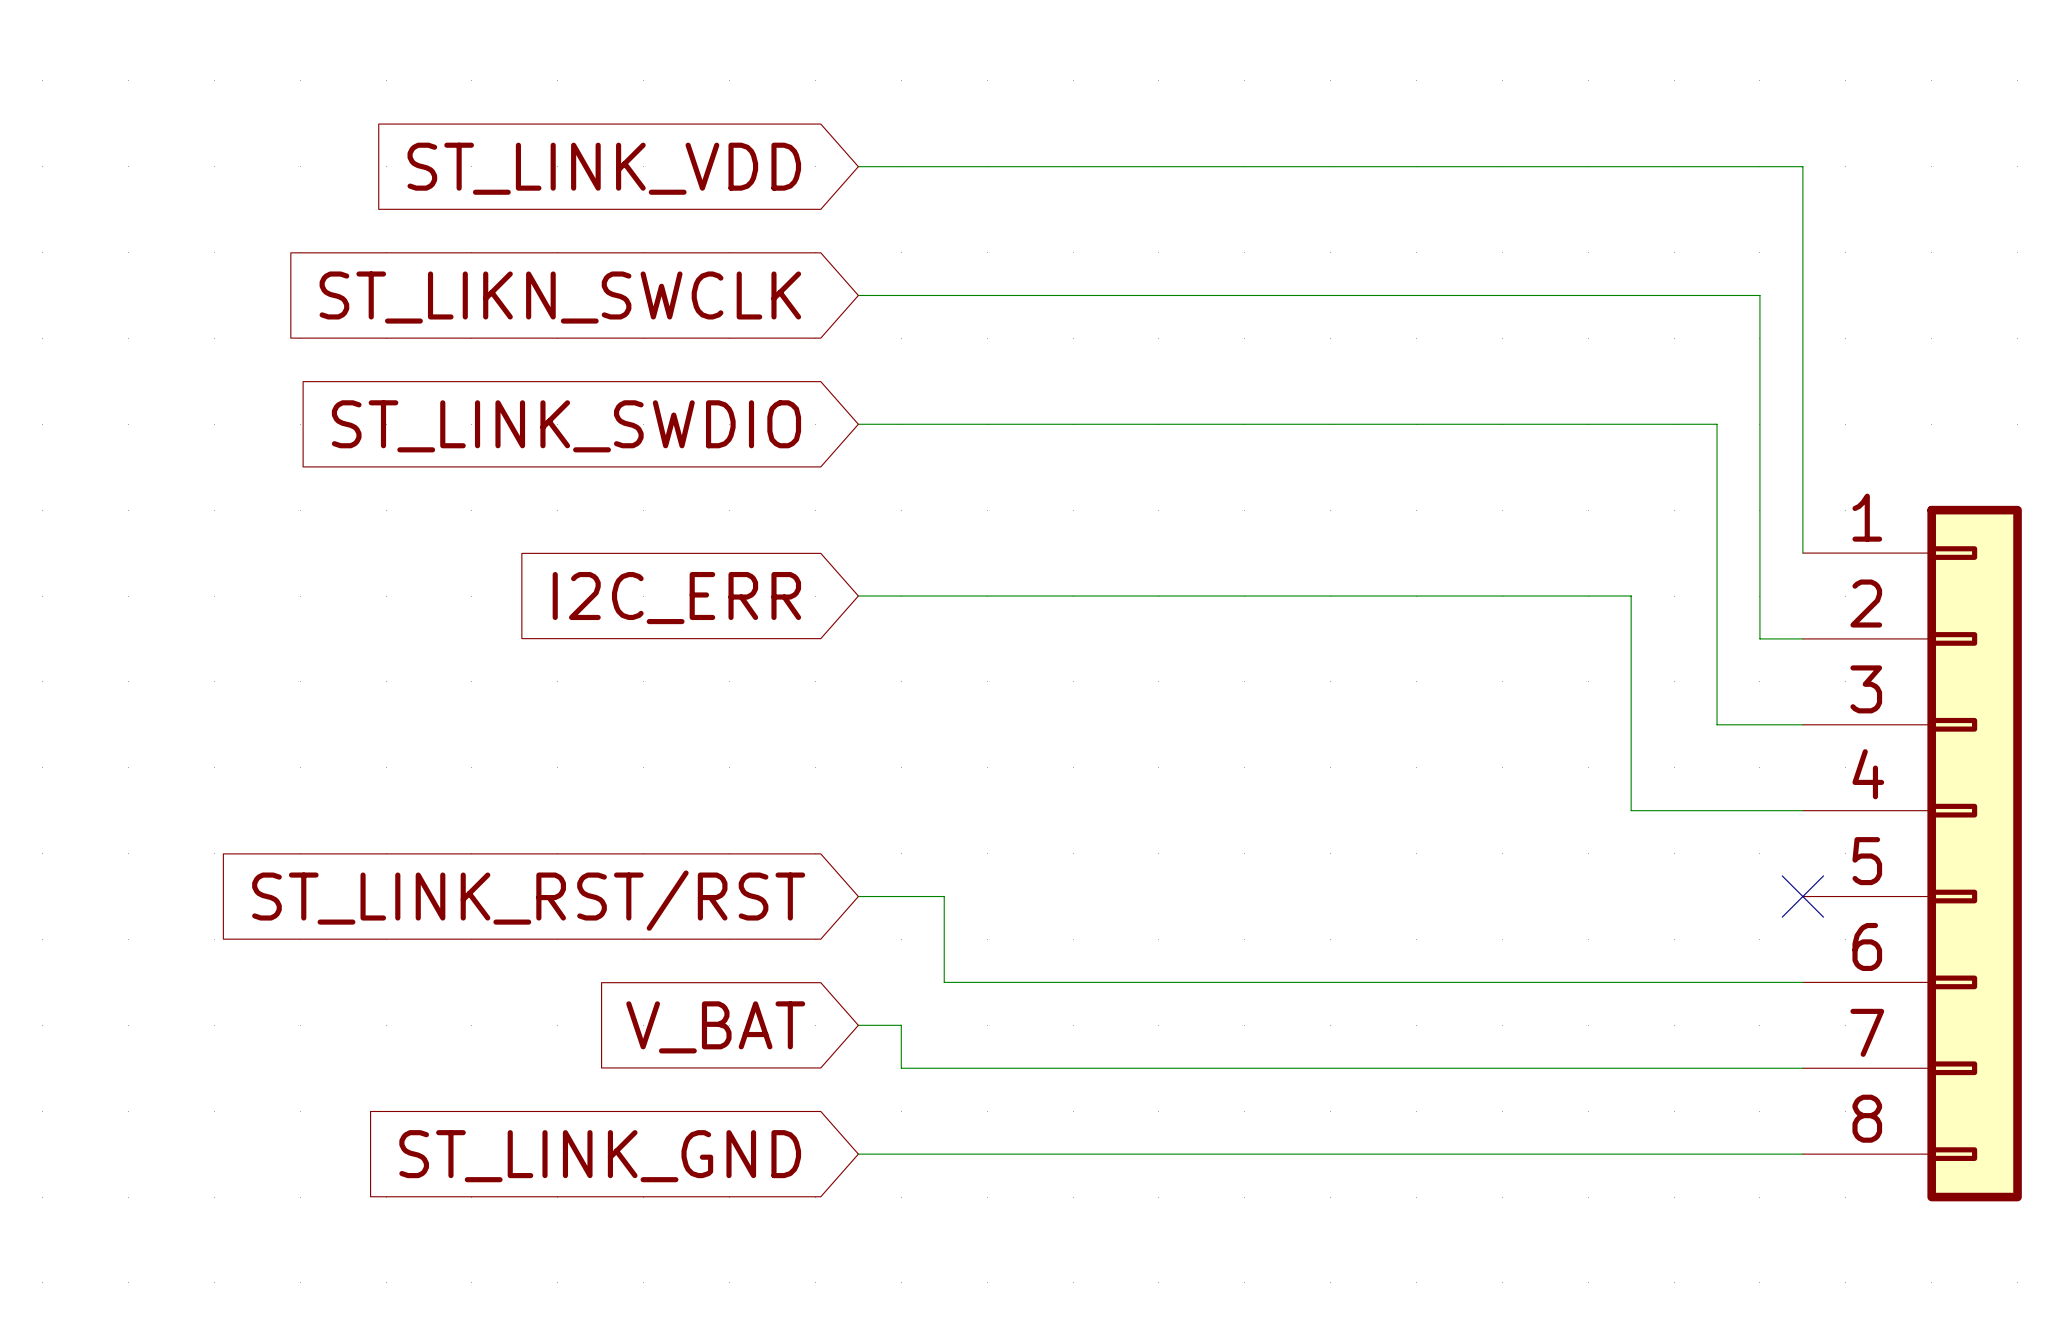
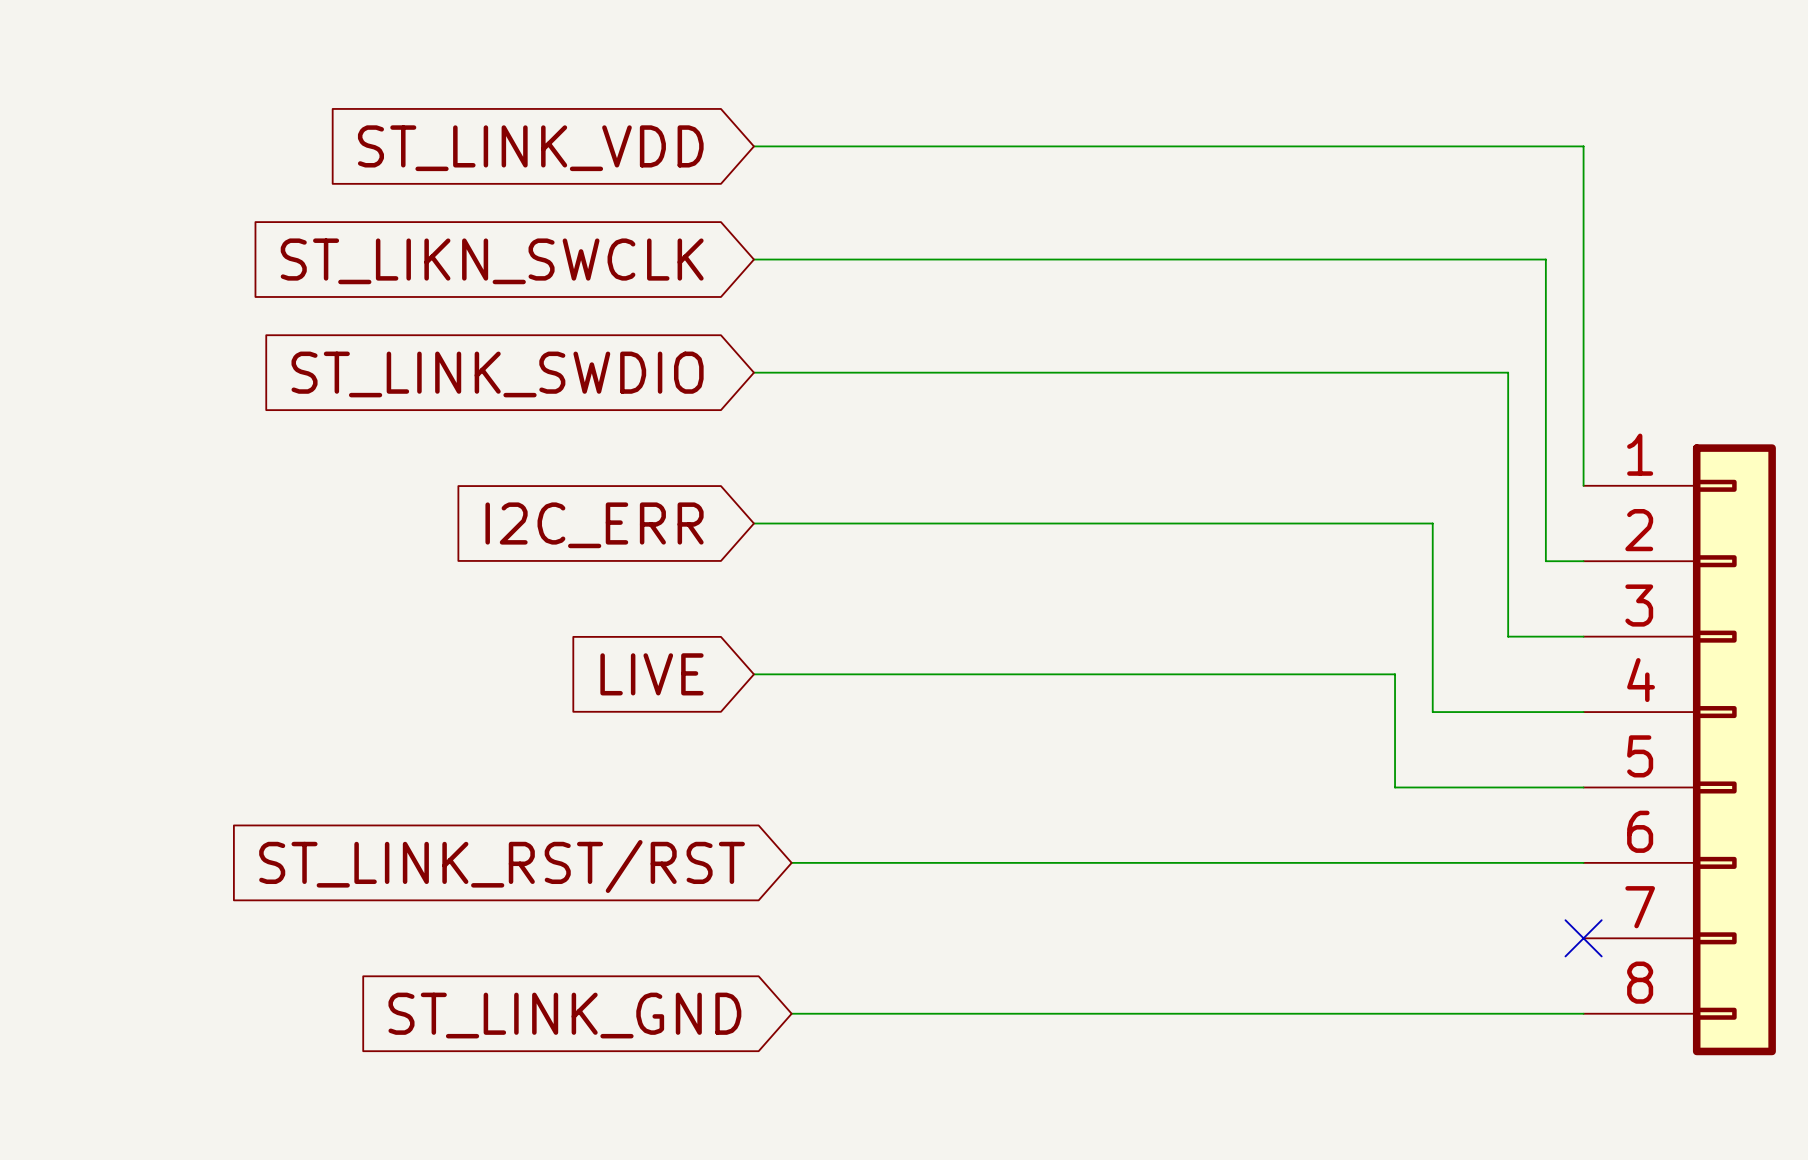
global label: none -> LIVE (651, 674)
wire: none -> (753, 674) (1395, 674) (1395, 787) (1583, 787)
wire: (858, 896) (944, 896) (944, 982) -> (791, 862) (829, 862)
no-connect mark position: (1802, 896) -> (1583, 938)
global label position: ST_LINK_RST/RST (528, 900) -> ST_LINK_RST/RST (502, 866)
wire: (858, 1025) (901, 1025) (901, 1068) (1802, 1068) -> none
global label: V_BAT (715, 1027) -> none
wire: (858, 1154) (901, 1154) -> none
global label position: ST_LINK_GND (600, 1156) -> ST_LINK_GND (564, 1015)

